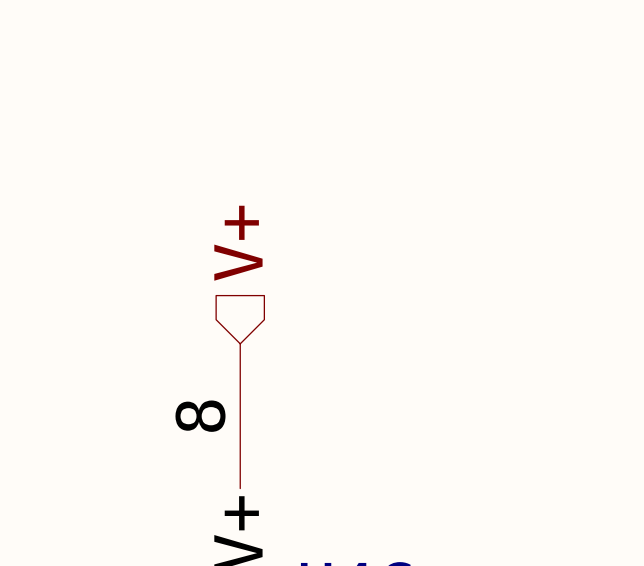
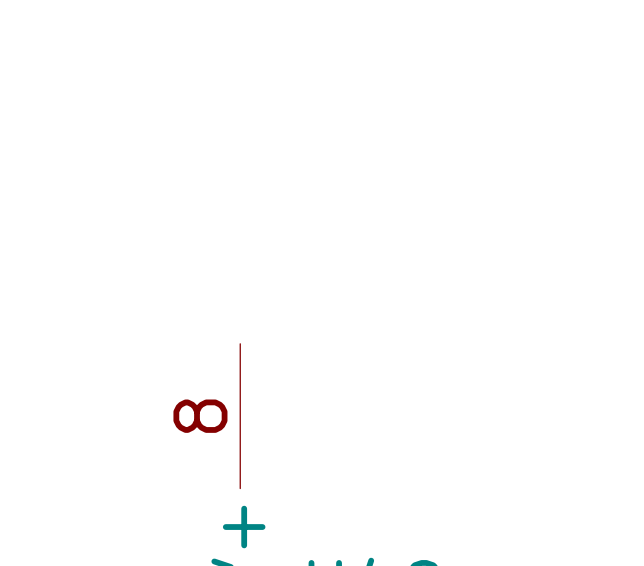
hierarchical label: V+ (238, 243) -> none

